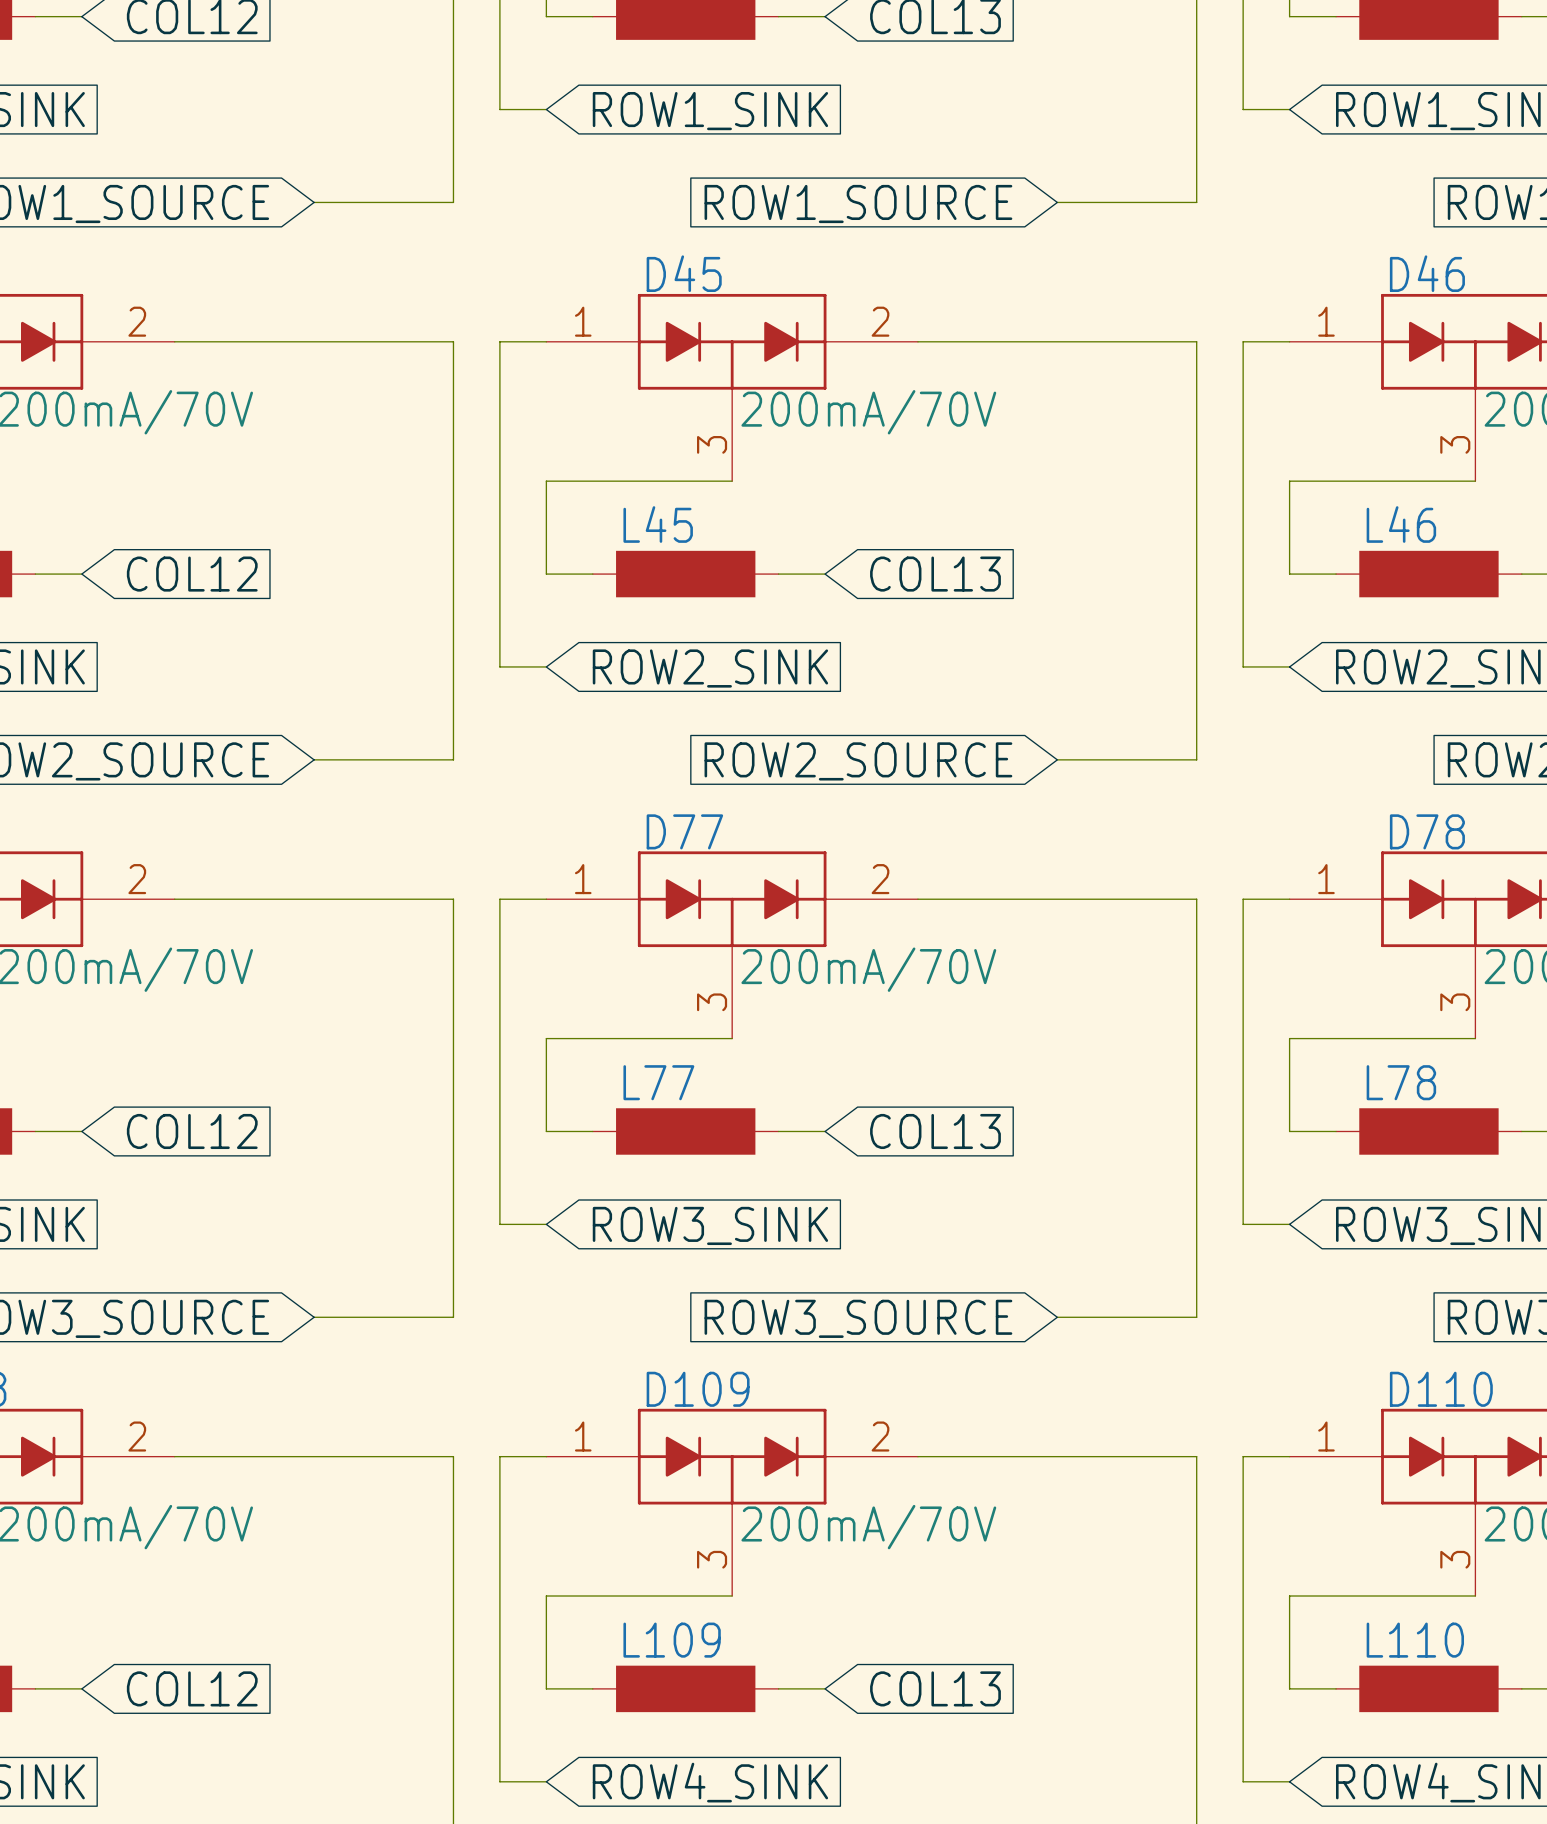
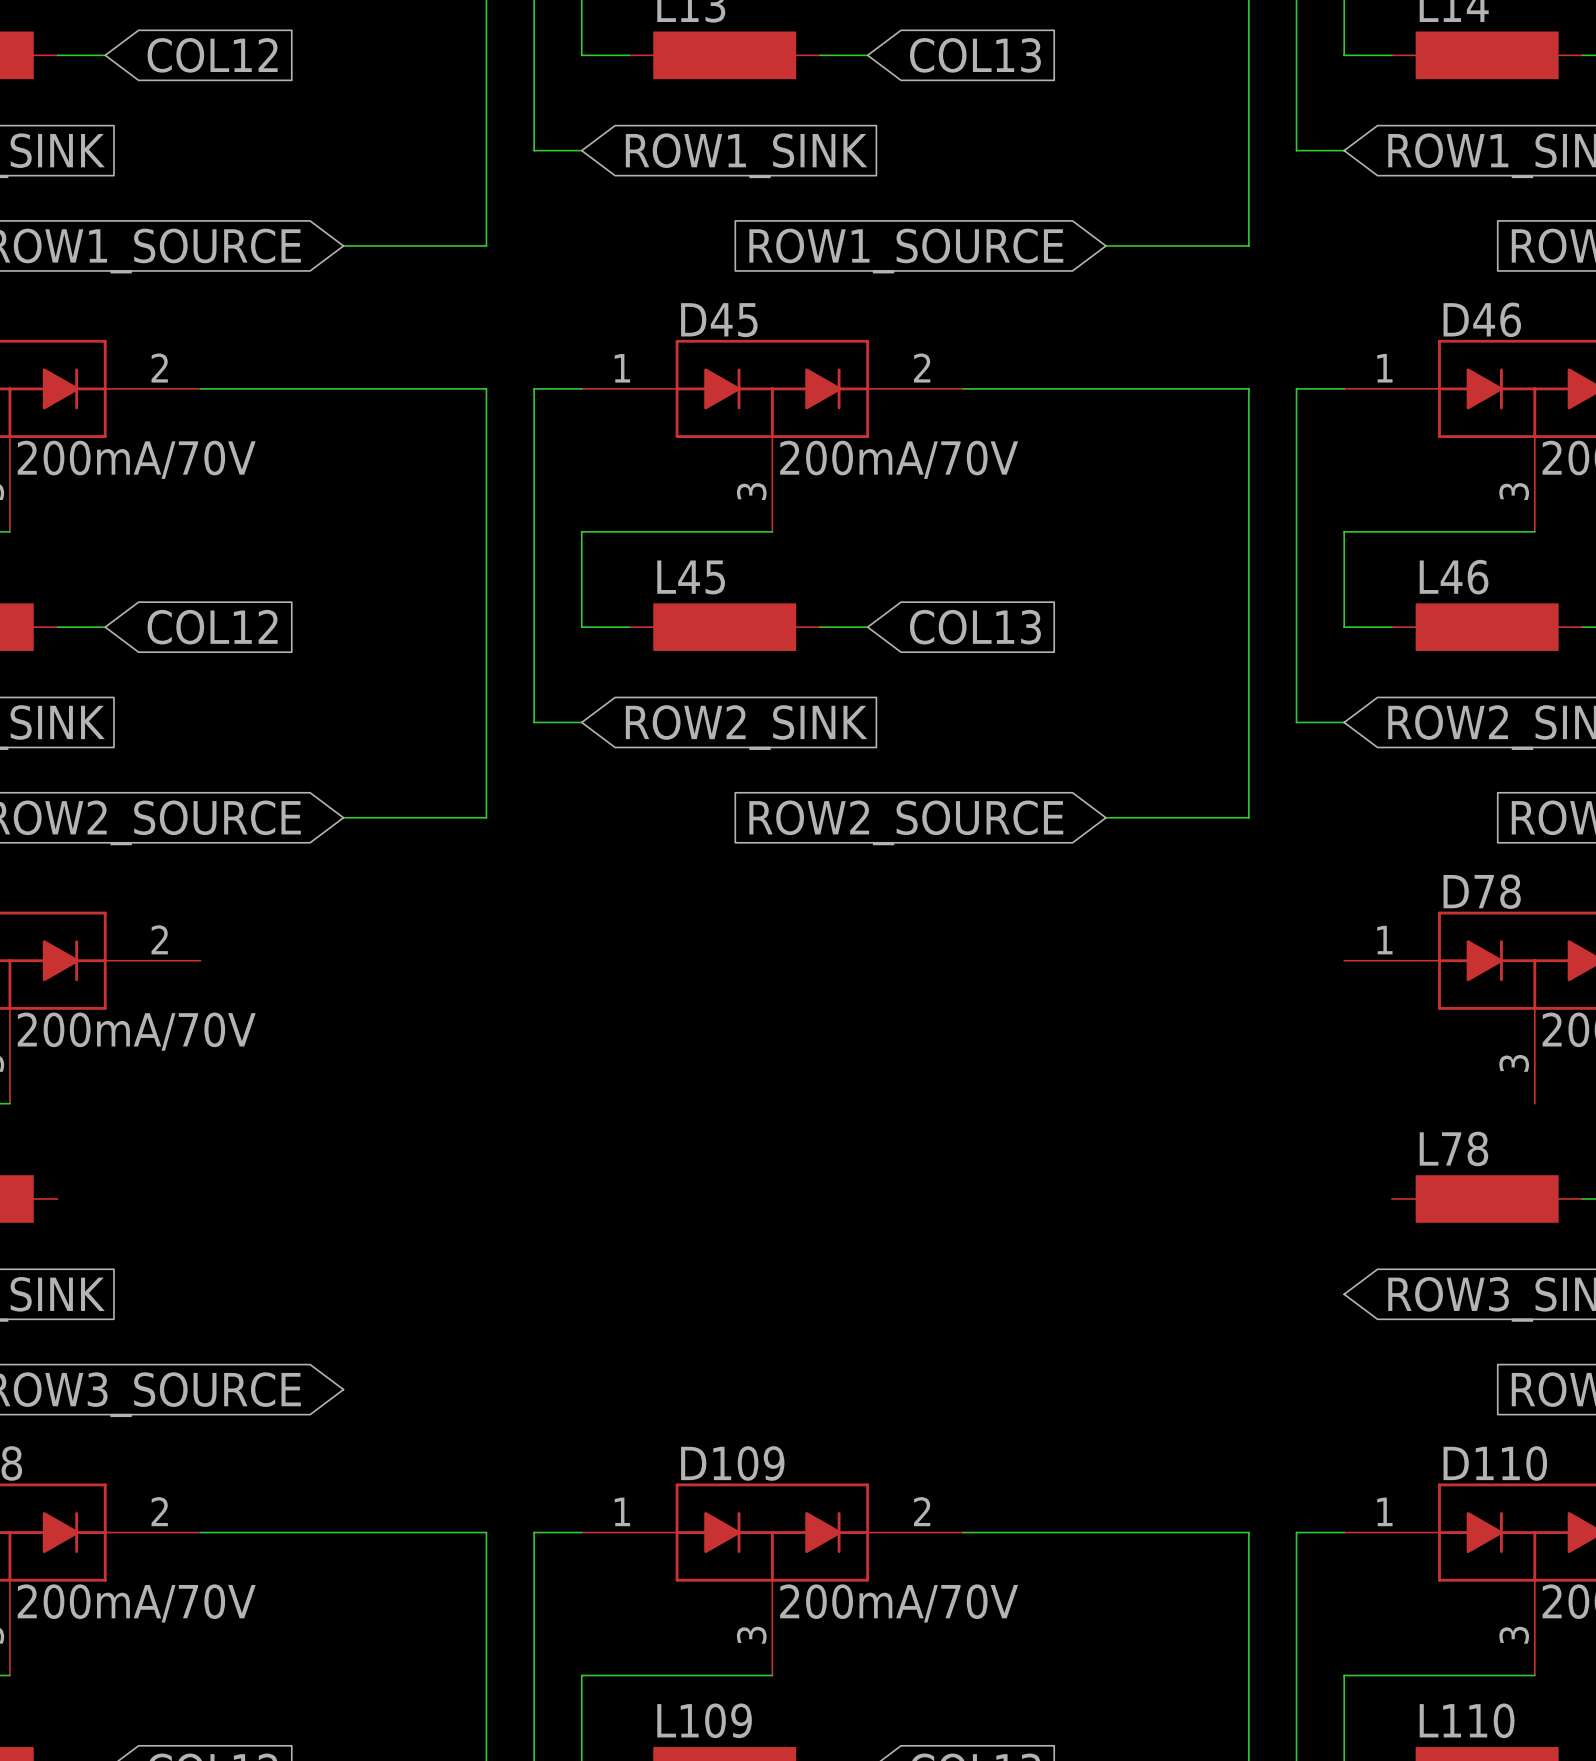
wire: (174, 899) (453, 899) (453, 1317) (314, 1317) -> none
wire: (546, 899) (499, 899) (499, 1224) (546, 1224) -> none
wire: (917, 899) (1196, 899) (1196, 1317) (1057, 1317) -> none
wire: (1289, 899) (1243, 899) (1243, 1224) (1289, 1224) -> none
D77: 200mA/70V (732, 944) -> none
wire: (732, 1038) (546, 1038) (546, 1131) (592, 1131) -> none
wire: (1475, 1038) (1289, 1038) (1289, 1131) (1336, 1131) -> none
wire: (35, 1131) (81, 1131) -> none
global label: COL12 (192, 1131) -> none
L77: (685, 1131) -> none
wire: (778, 1131) (825, 1131) -> none
global label: COL13 (935, 1131) -> none
global label: ROW3_SINK (710, 1225) -> none
global label: ROW3_SOURCE (858, 1318) -> none

